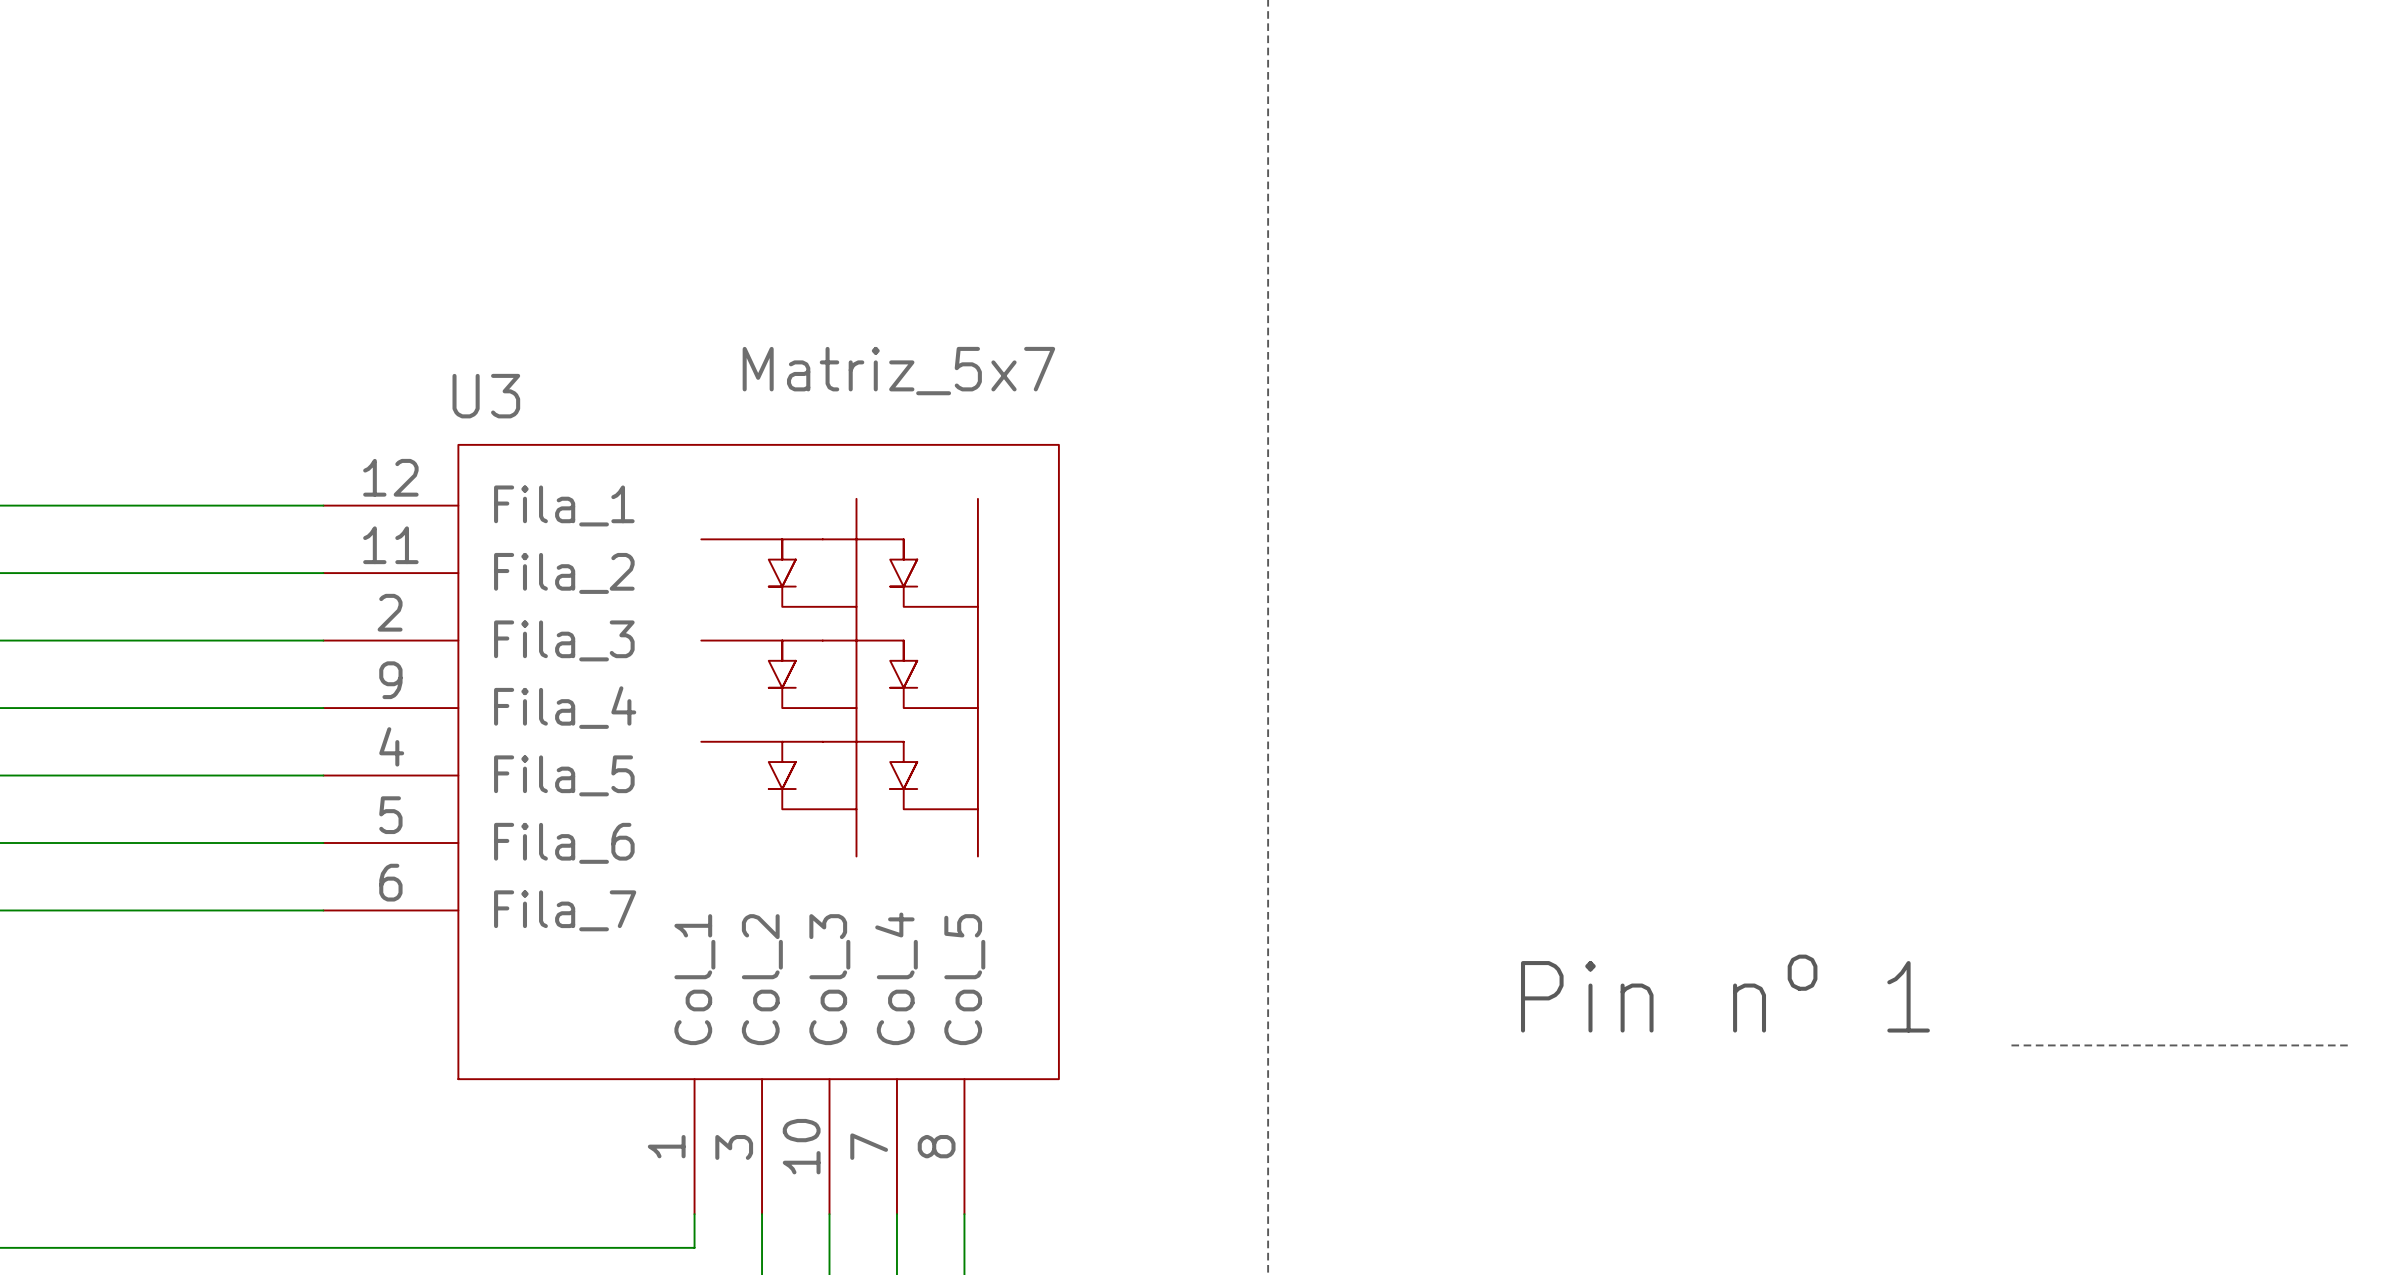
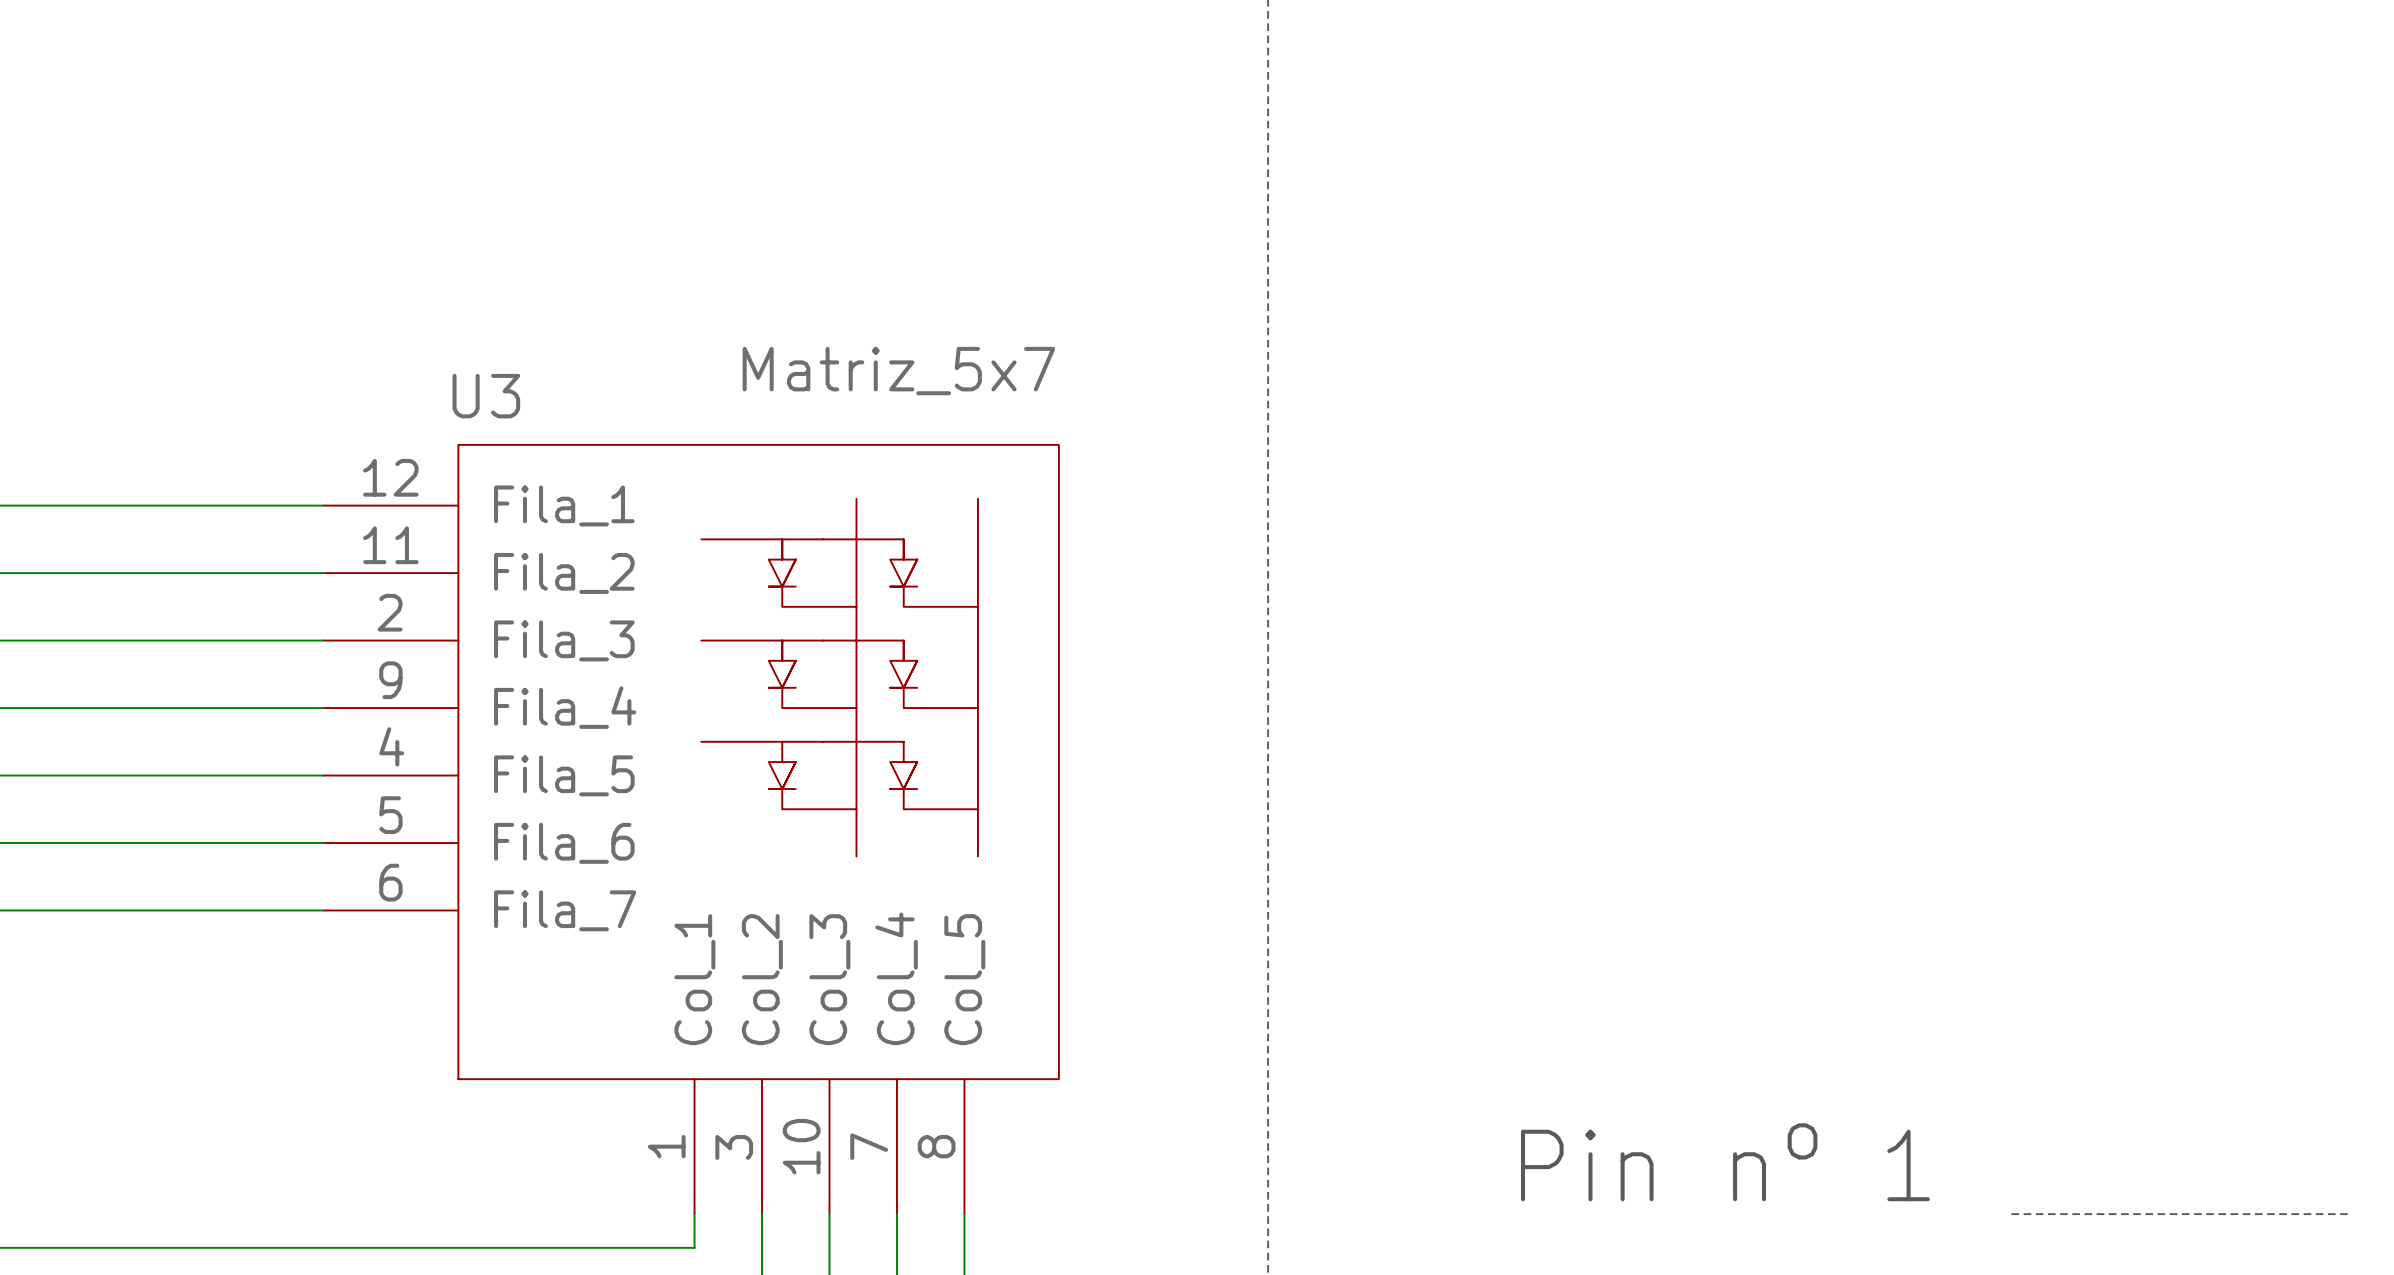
text position: Pin nº 1 (1725, 993) -> Pin nº 1 (1725, 1162)
line: (2010, 1045) (2347, 1045) -> (2010, 1214) (2347, 1214)

